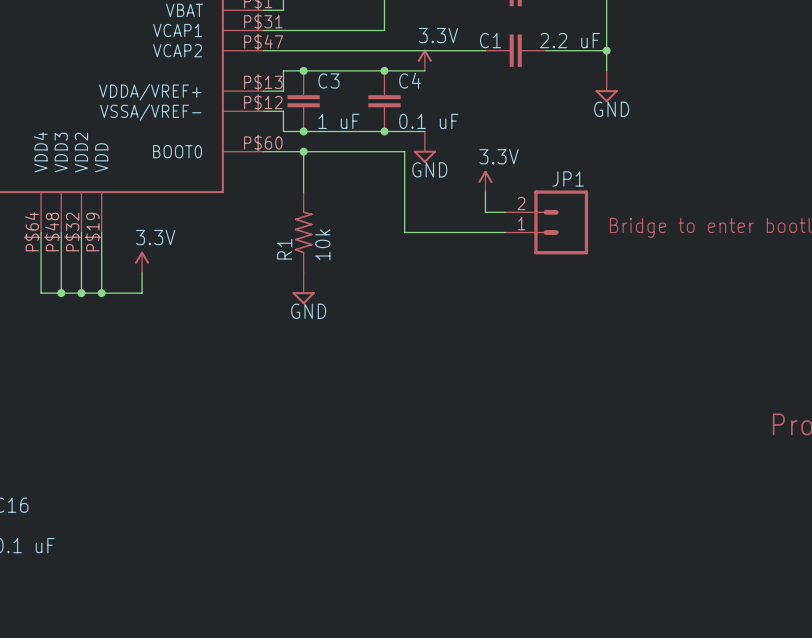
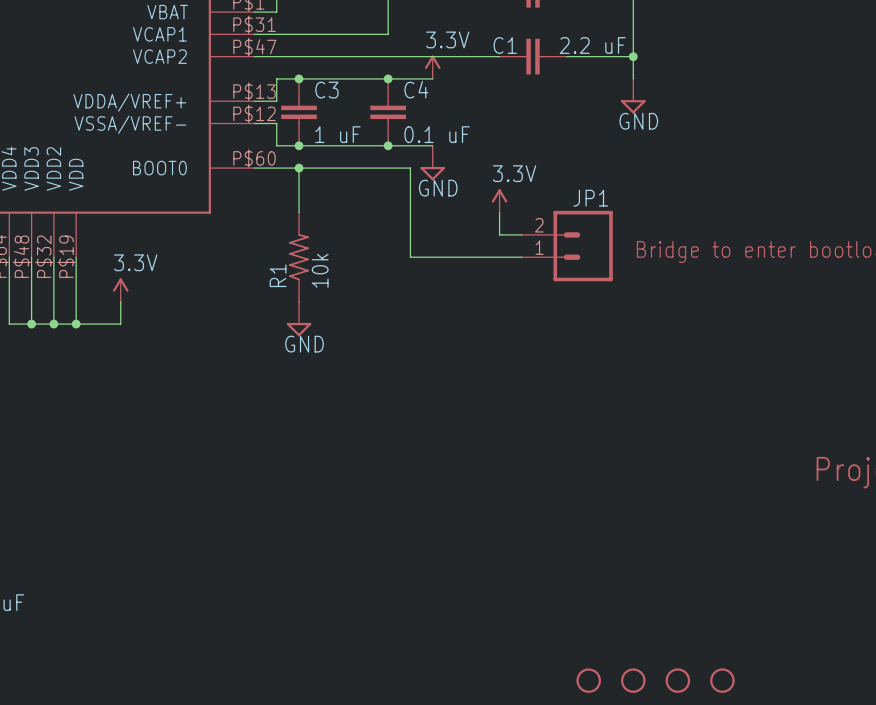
part: none -> (588, 680)
part: none -> (633, 680)
part: none -> (677, 680)
part: none -> (722, 680)

